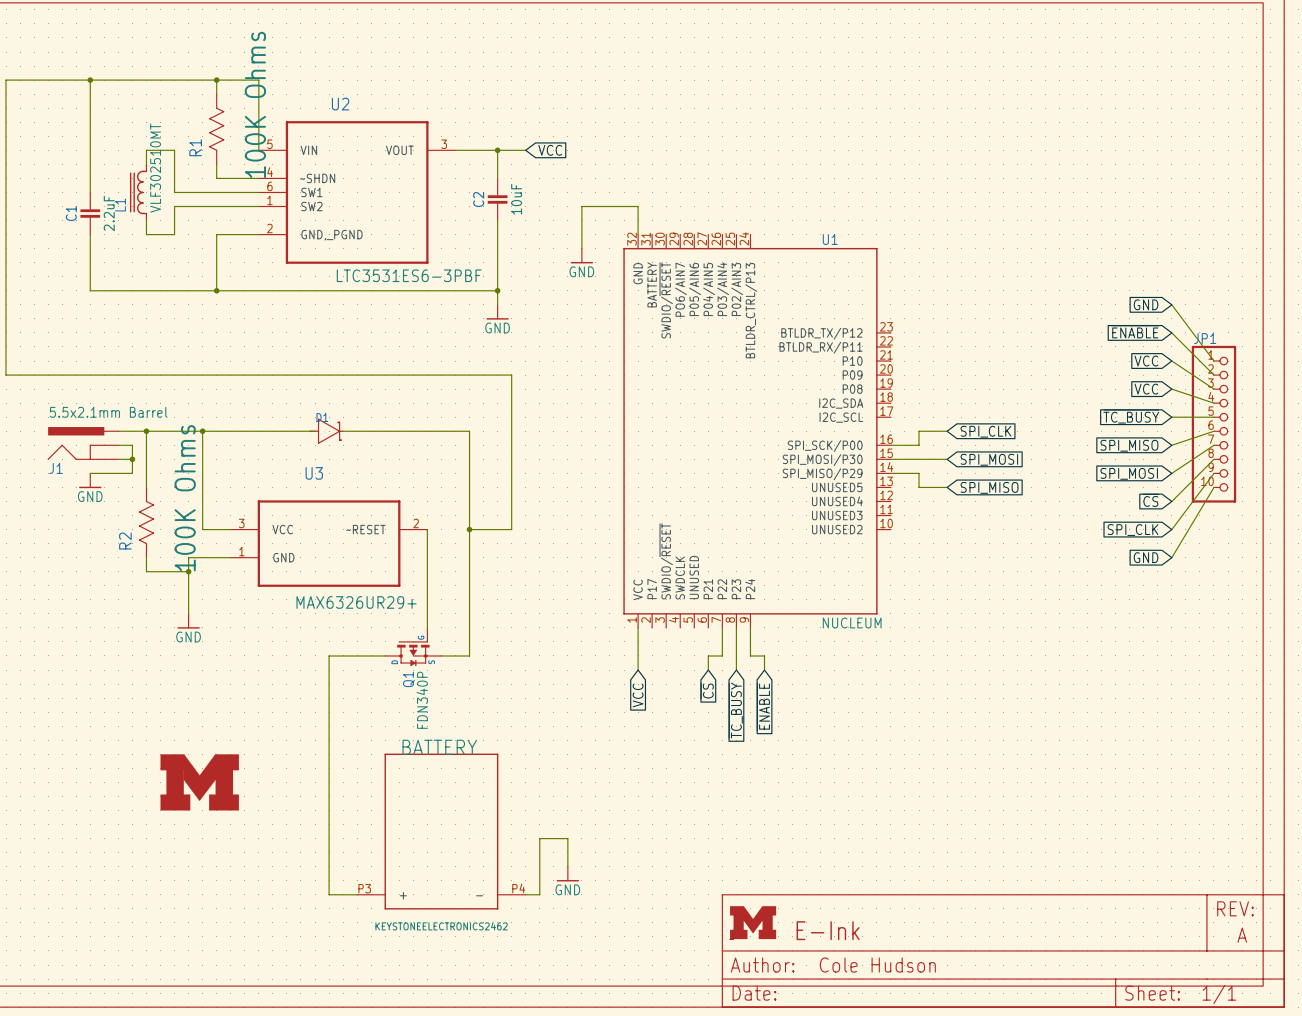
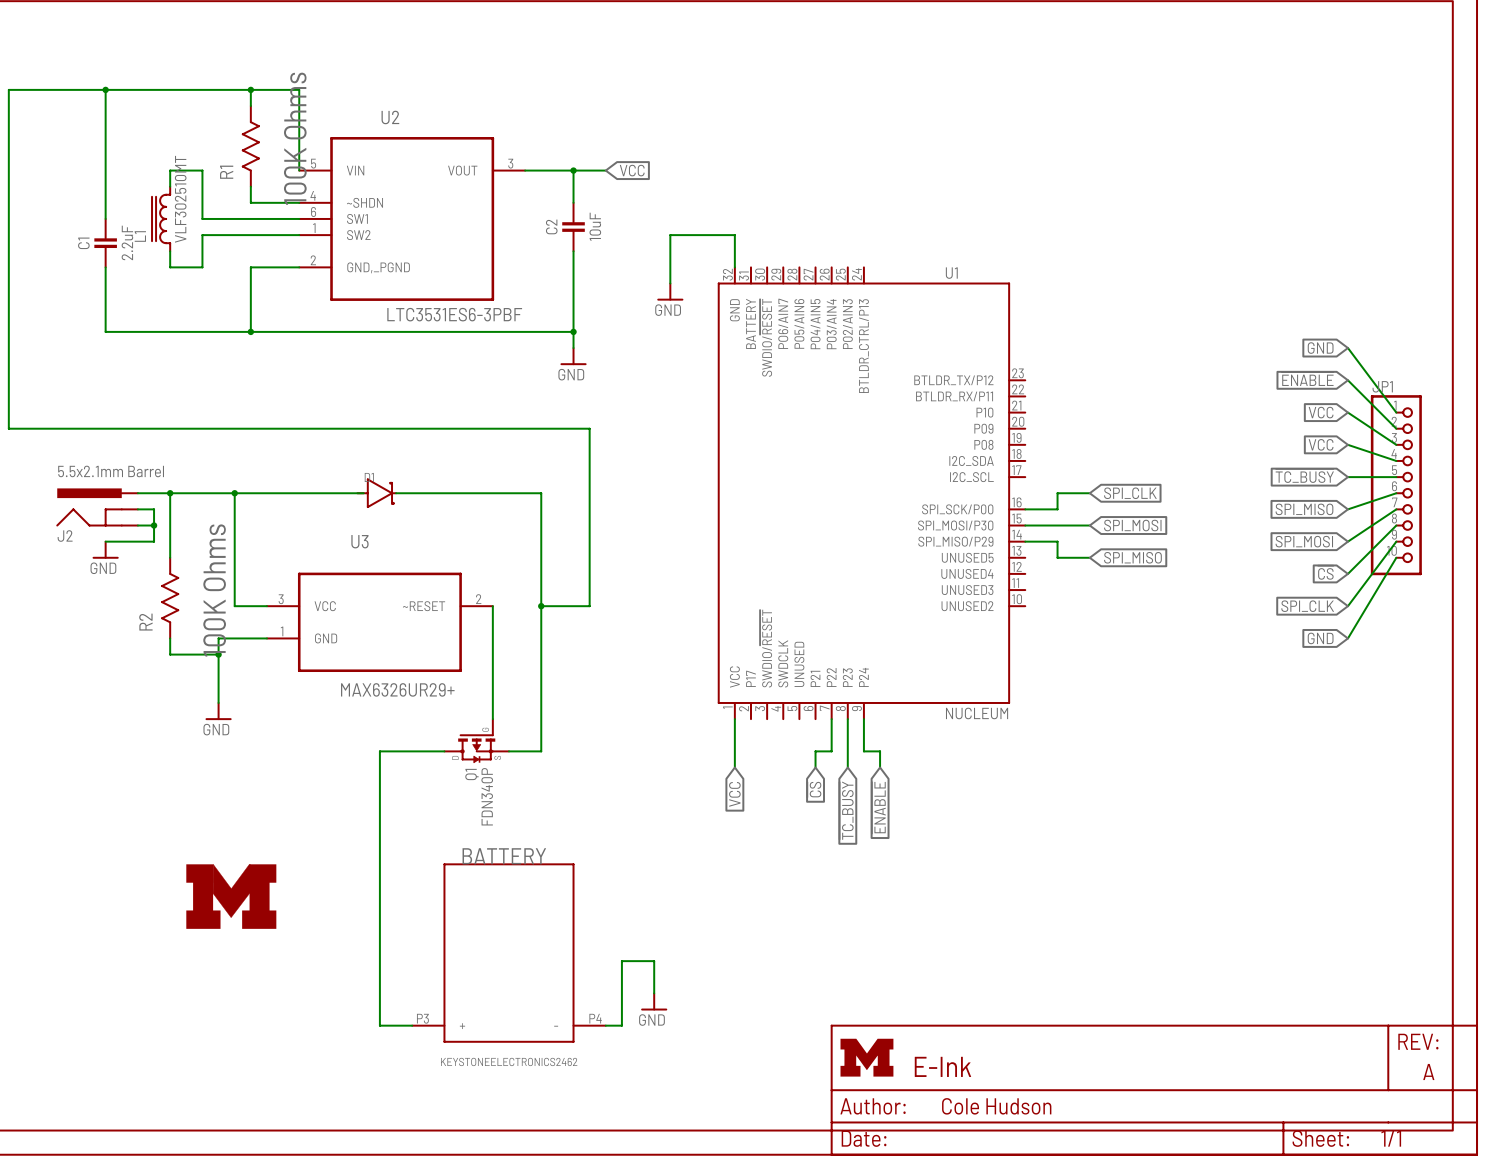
J1 name: J1 (56, 468) -> J2 (65, 536)

